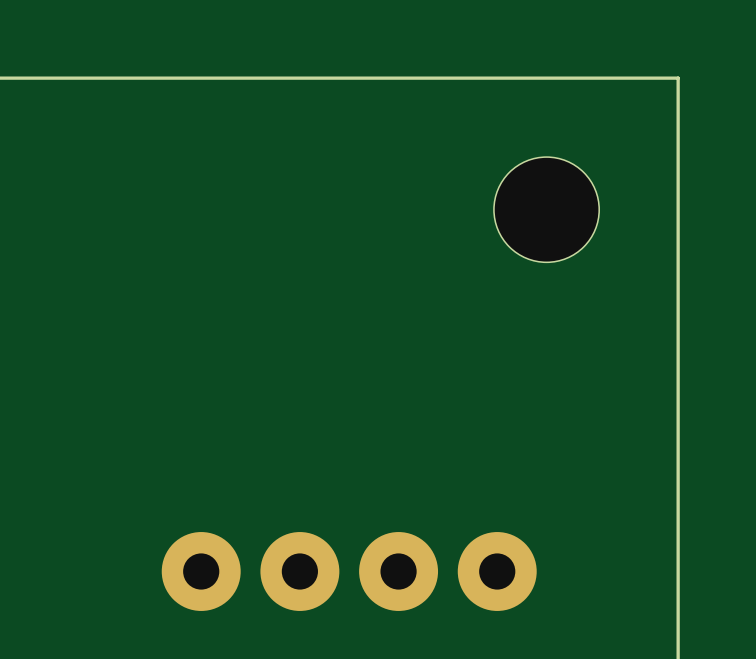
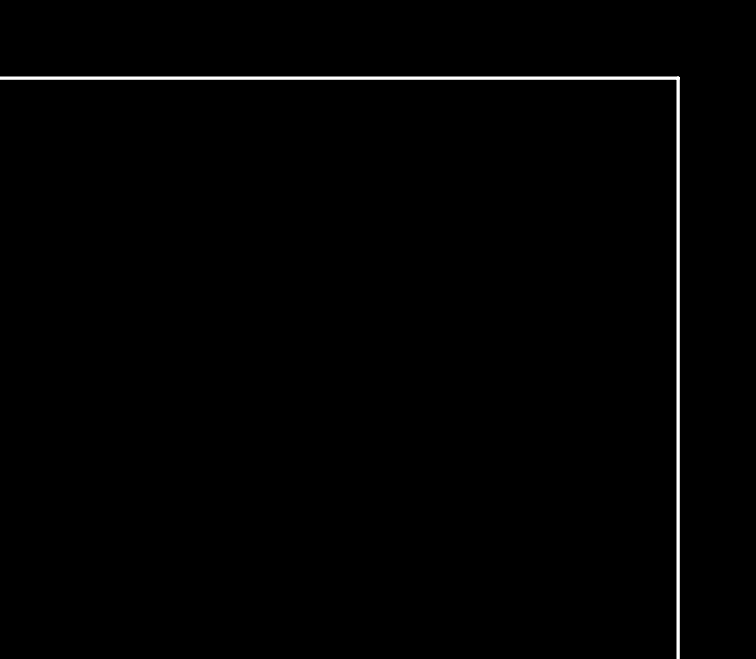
part: (546, 209) -> none
part: (349, 571) -> none

